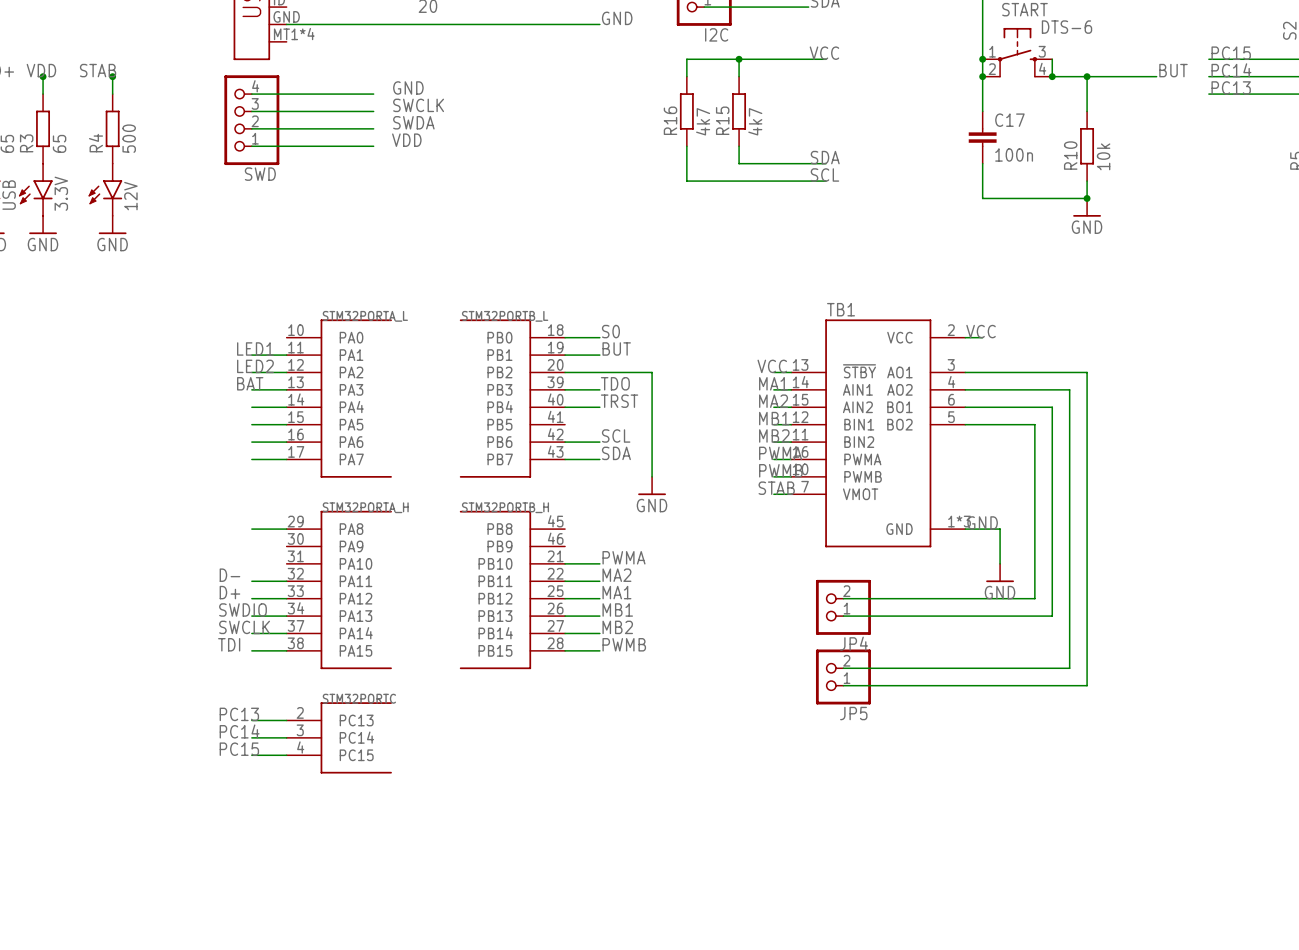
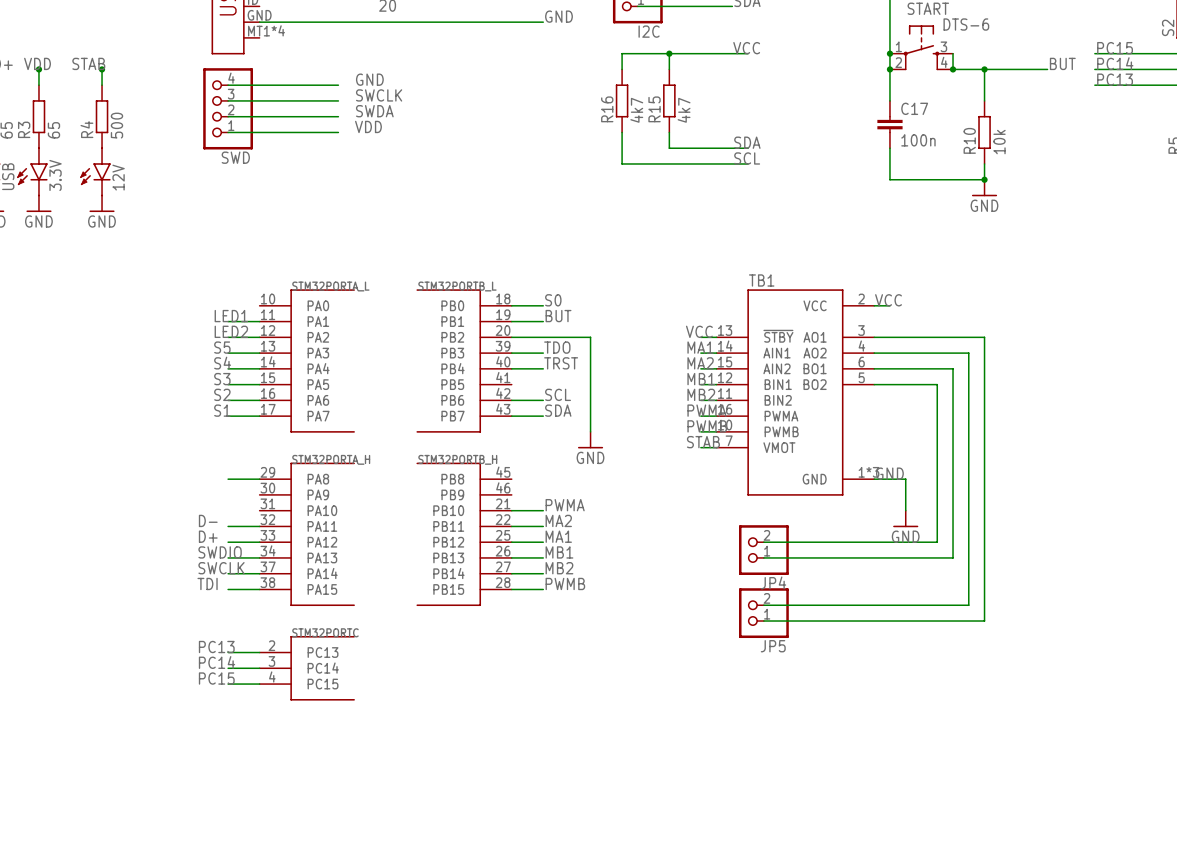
label: BAT (250, 383) -> S5 (222, 347)
label: none -> S4 (222, 363)
label: none -> S3 (222, 379)
label: none -> S2 (222, 394)
label: none -> S1 (222, 410)

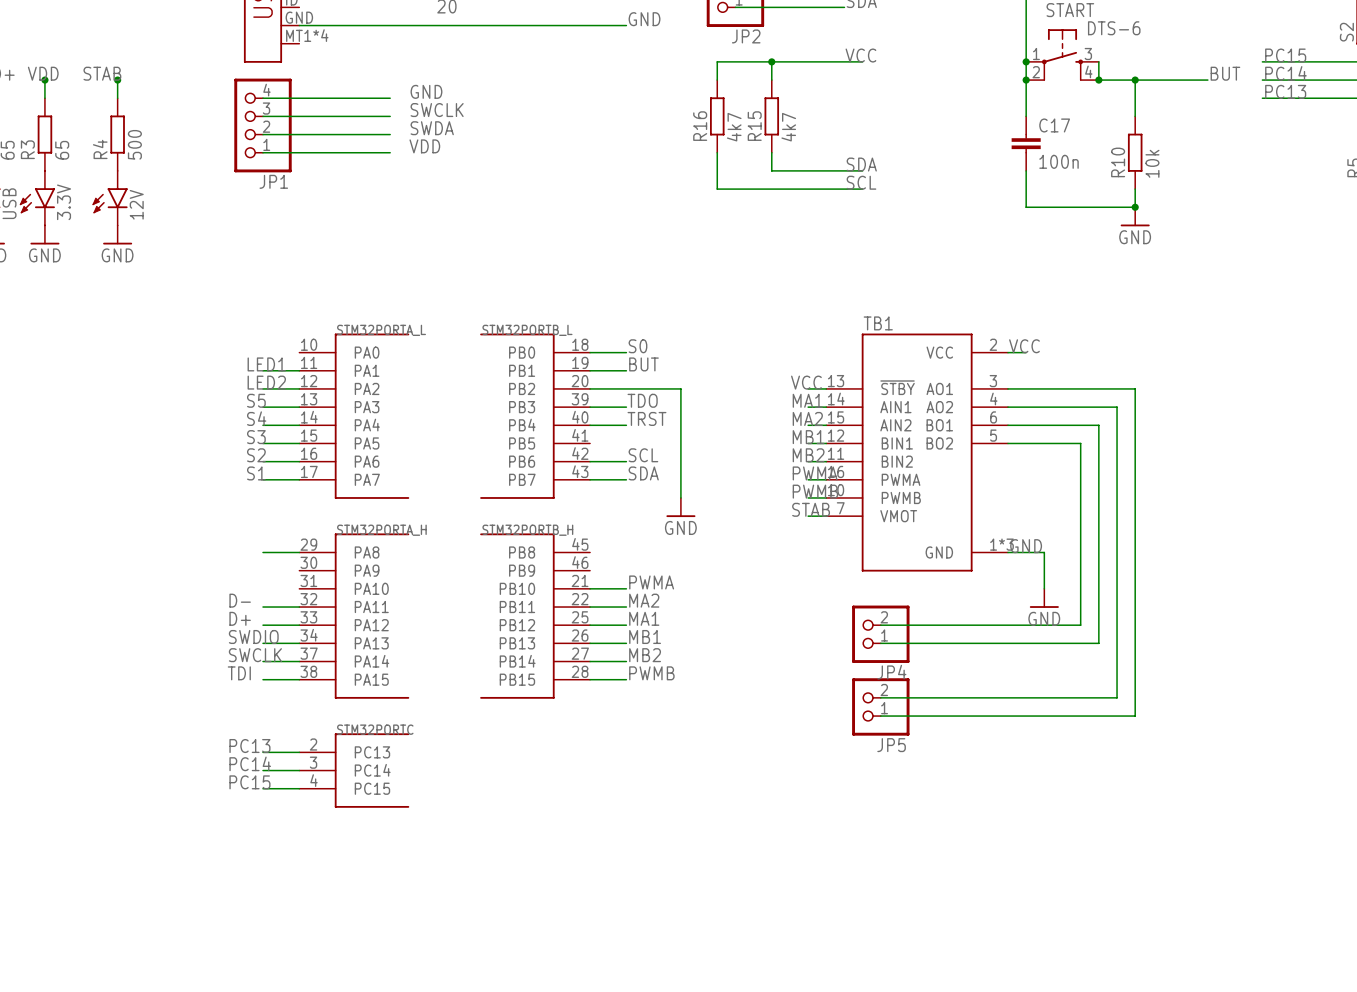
I2C name: I2C (649, 31) -> JP2 (746, 36)
SWD name: SWD (235, 157) -> JP1 (273, 181)

